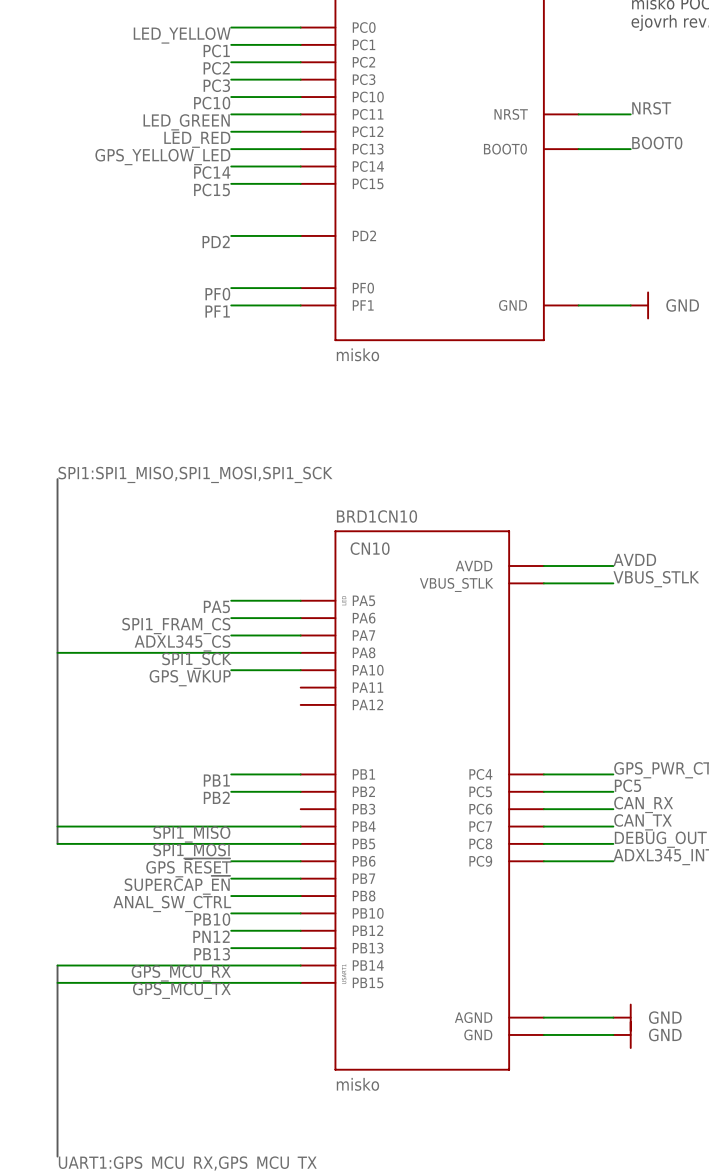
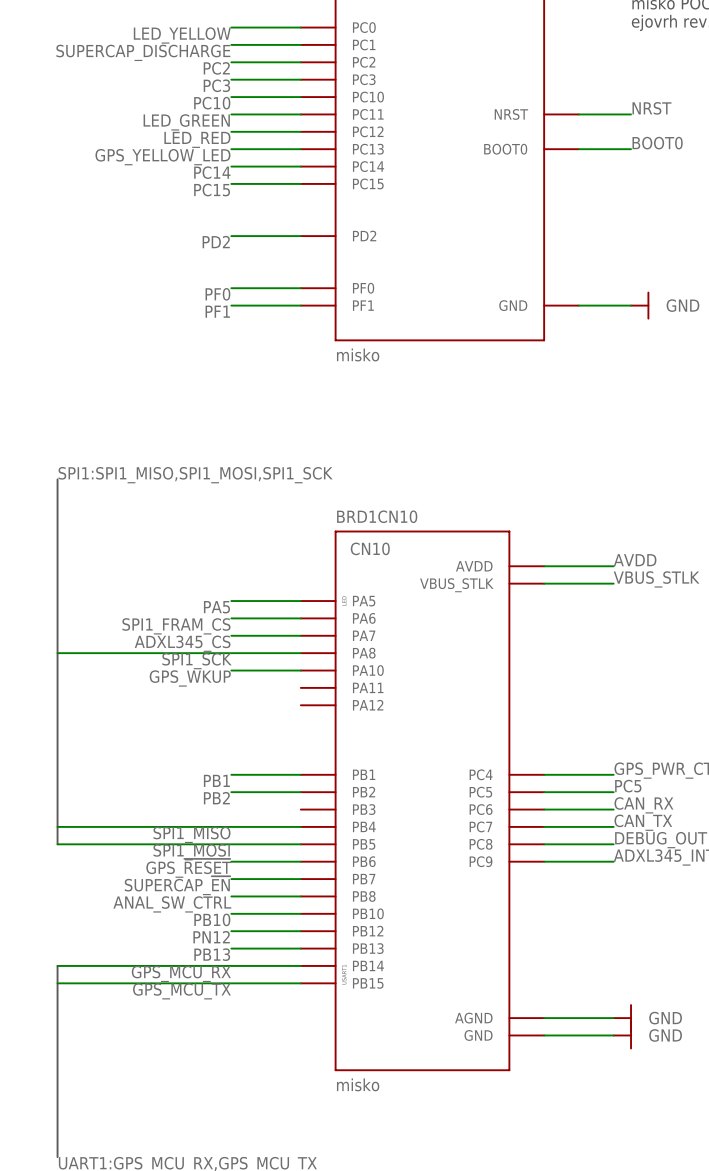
label: PC1 (216, 51) -> SUPERCAP_DISCHARGE (143, 52)

